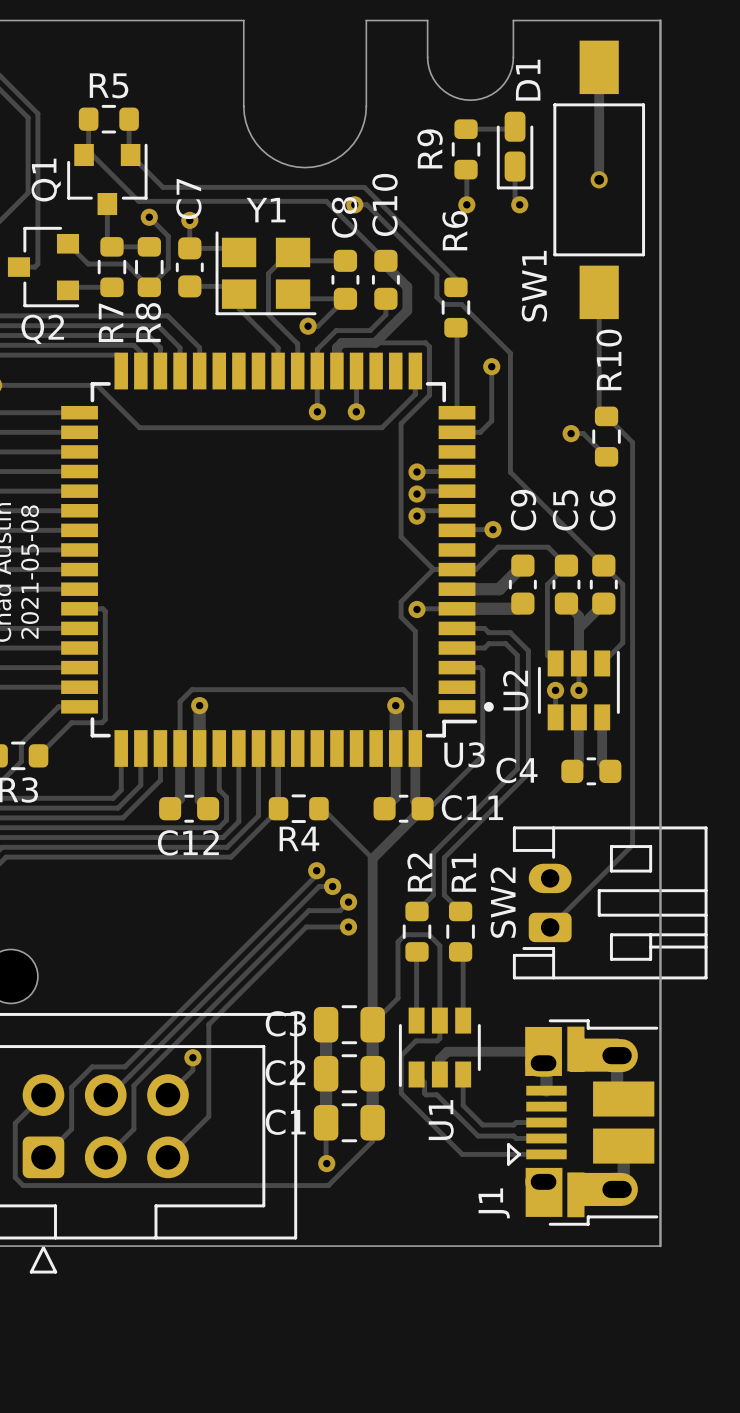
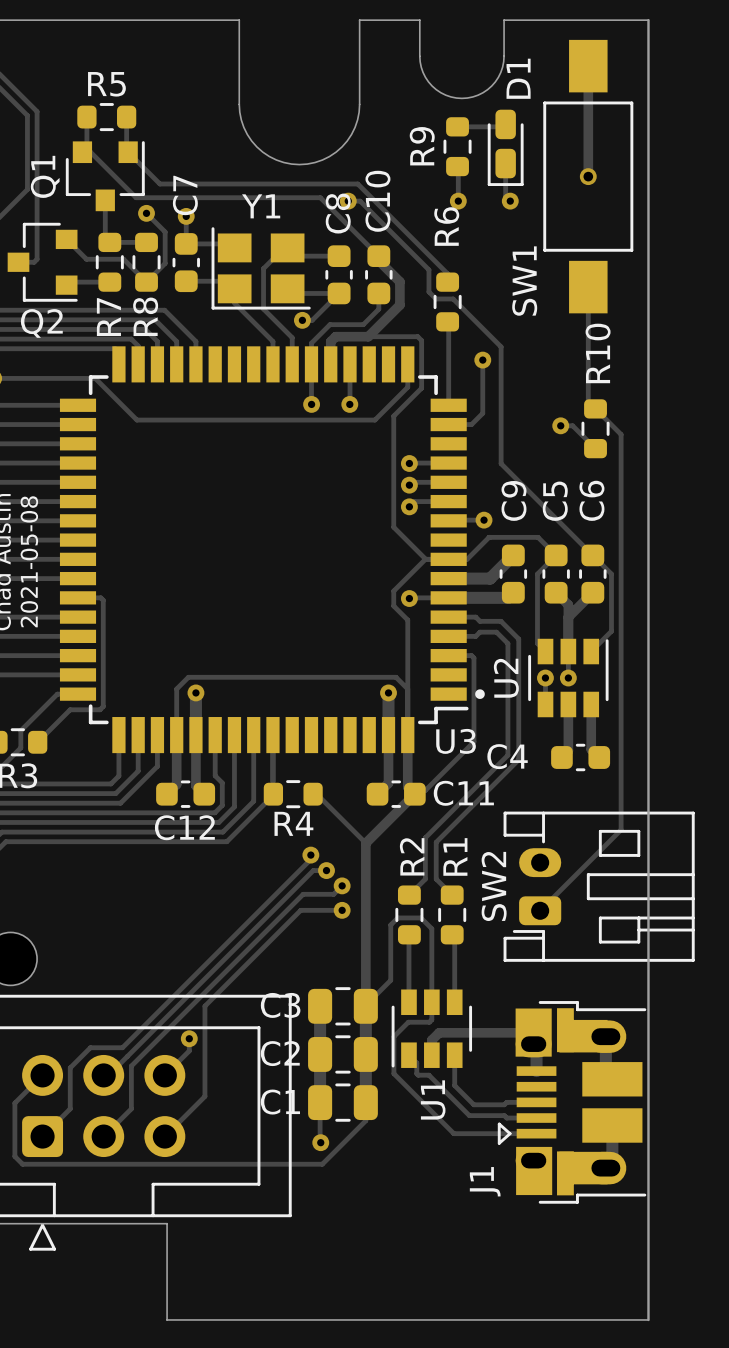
board edge: (170, 1246) (660, 1246) -> (167, 1223) (167, 1319) (648, 1319) (648, 1223)

